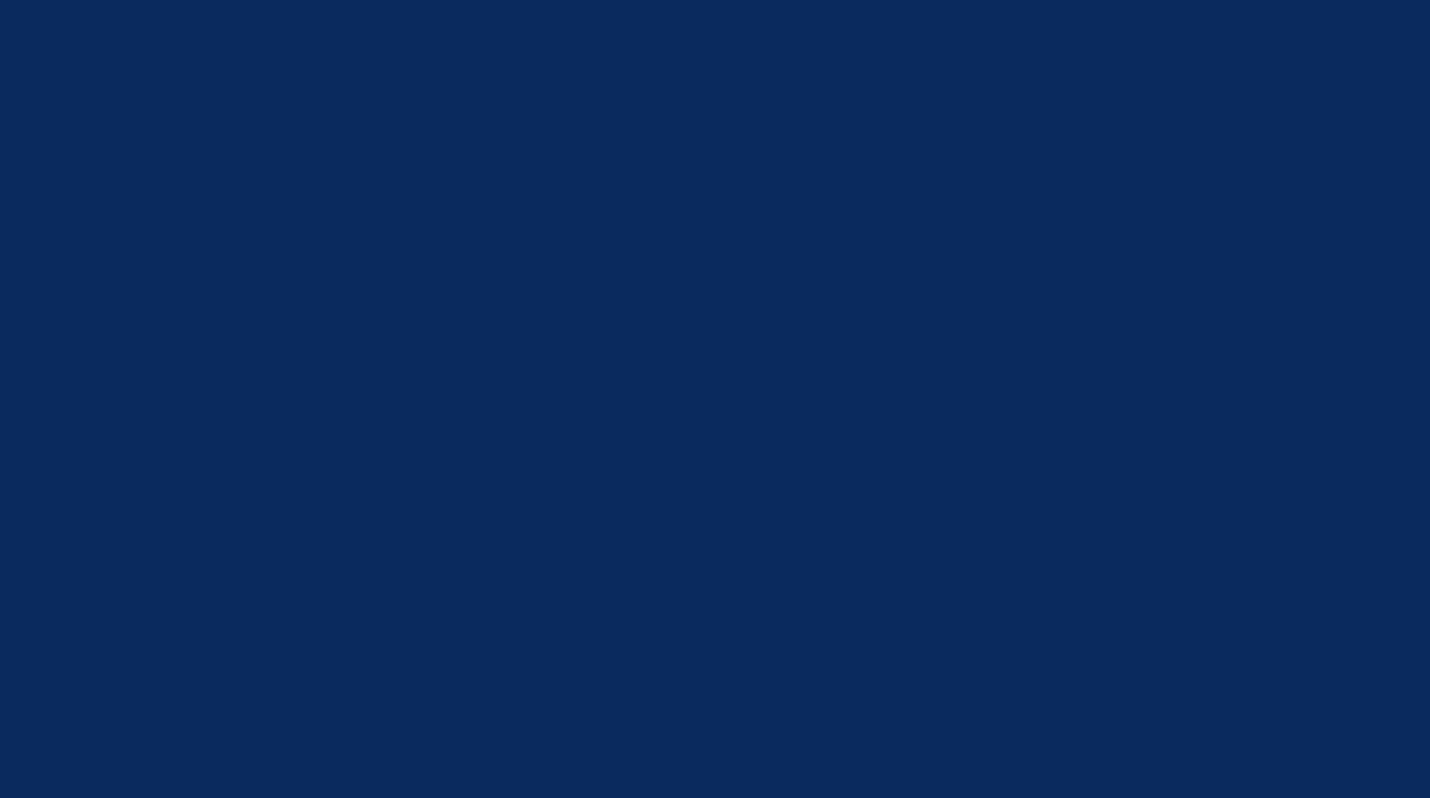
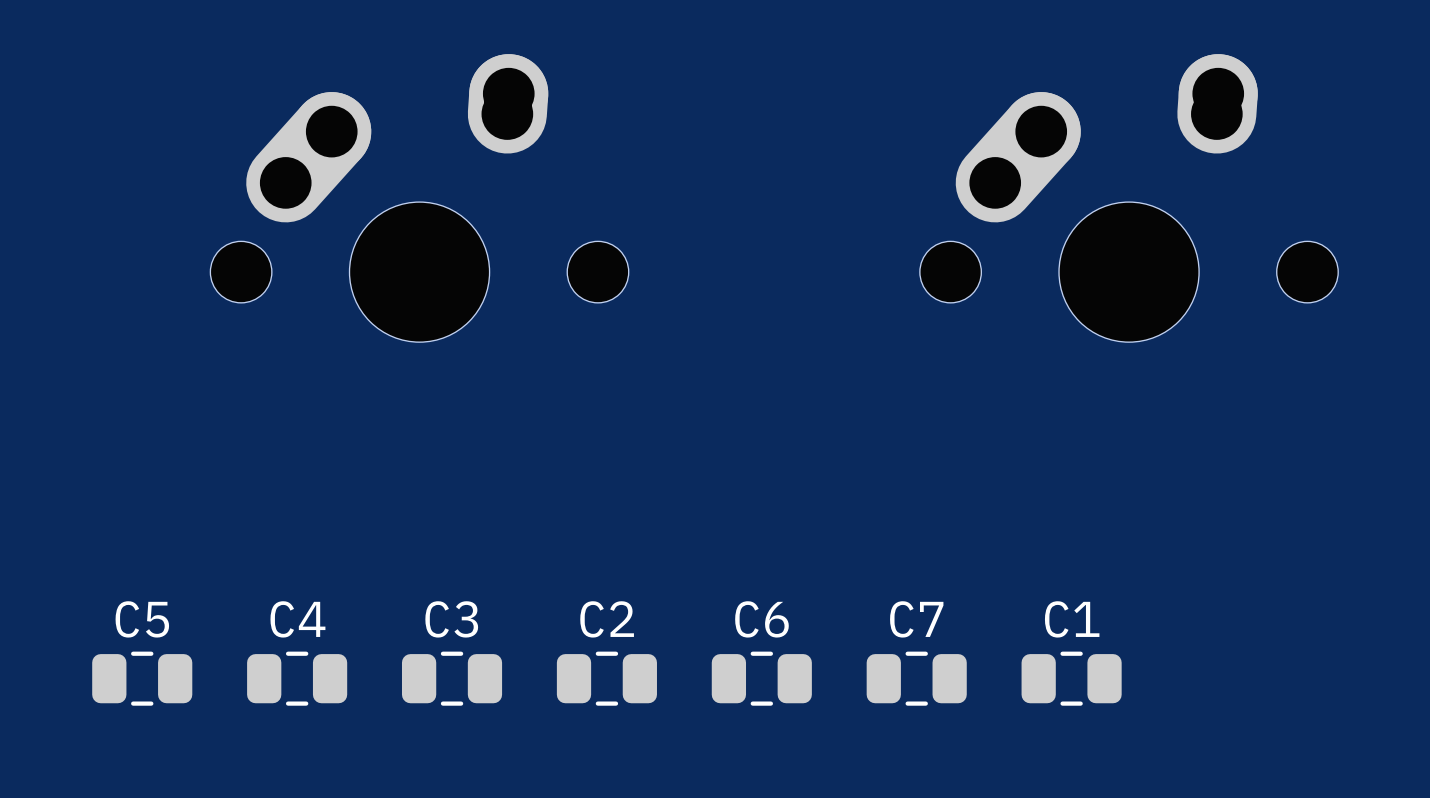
part: none -> (419, 198)
part: none -> (1129, 198)
C5: none -> (142, 678)
C4: none -> (297, 678)
C3: none -> (452, 678)
C2: none -> (606, 678)
C6: none -> (761, 678)
C7: none -> (916, 678)
C1: none -> (1071, 678)

